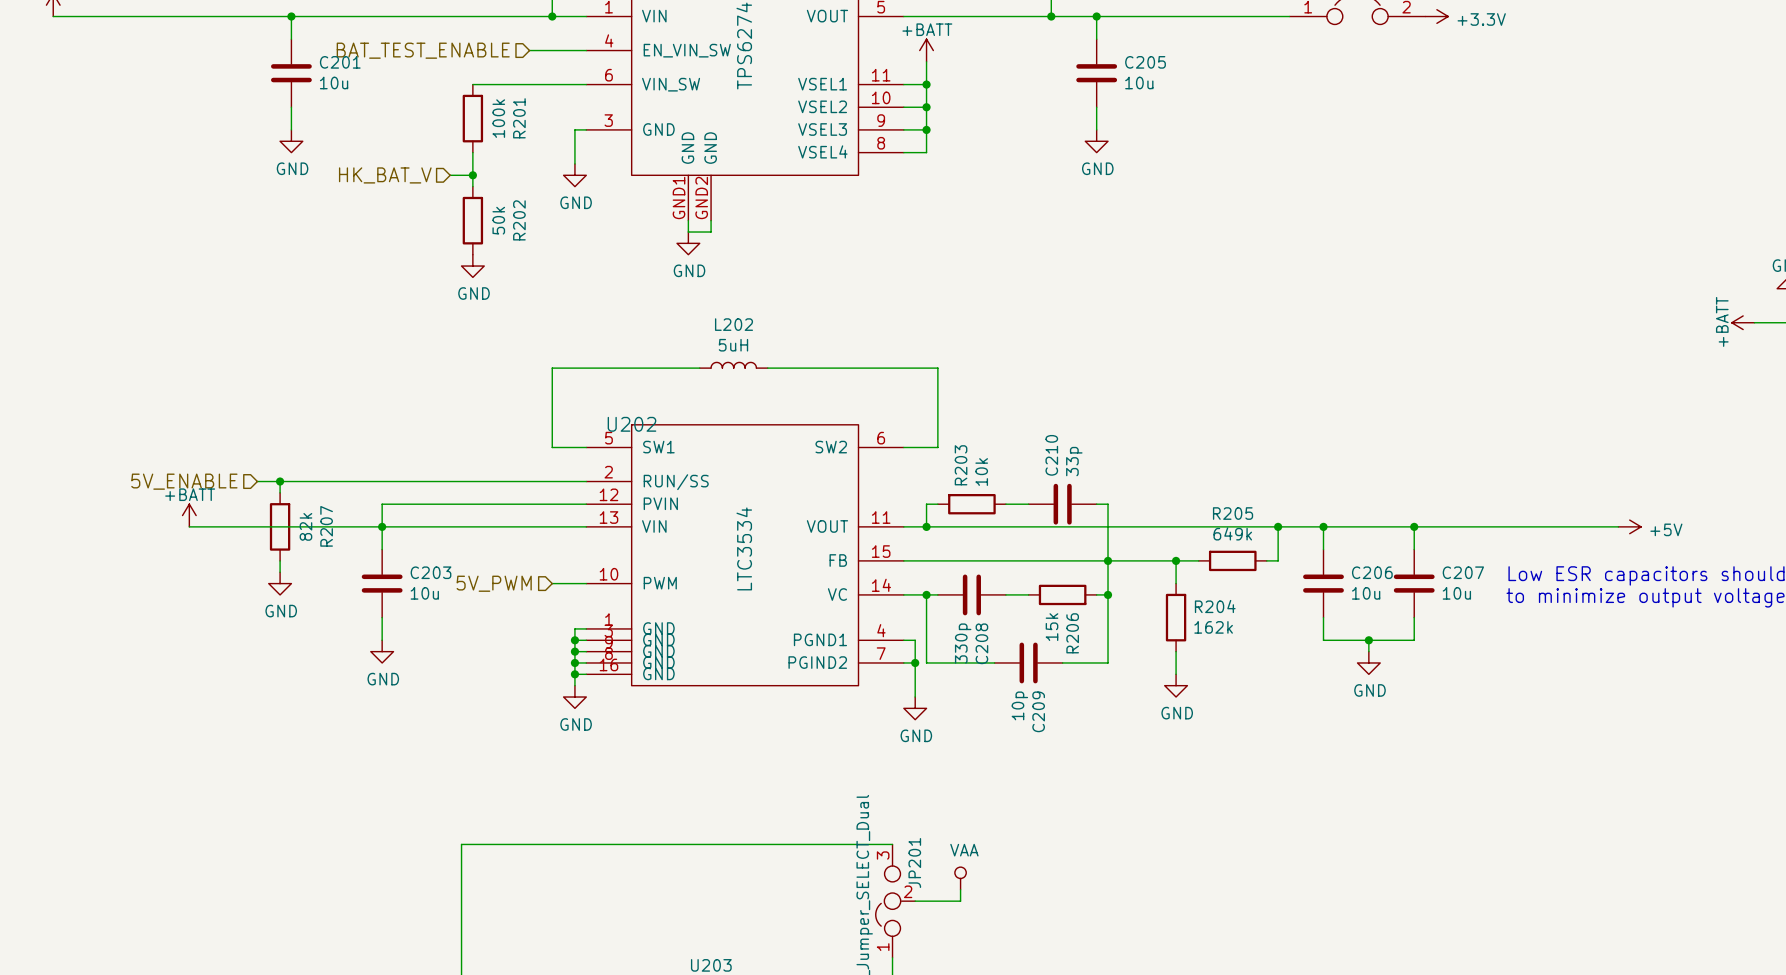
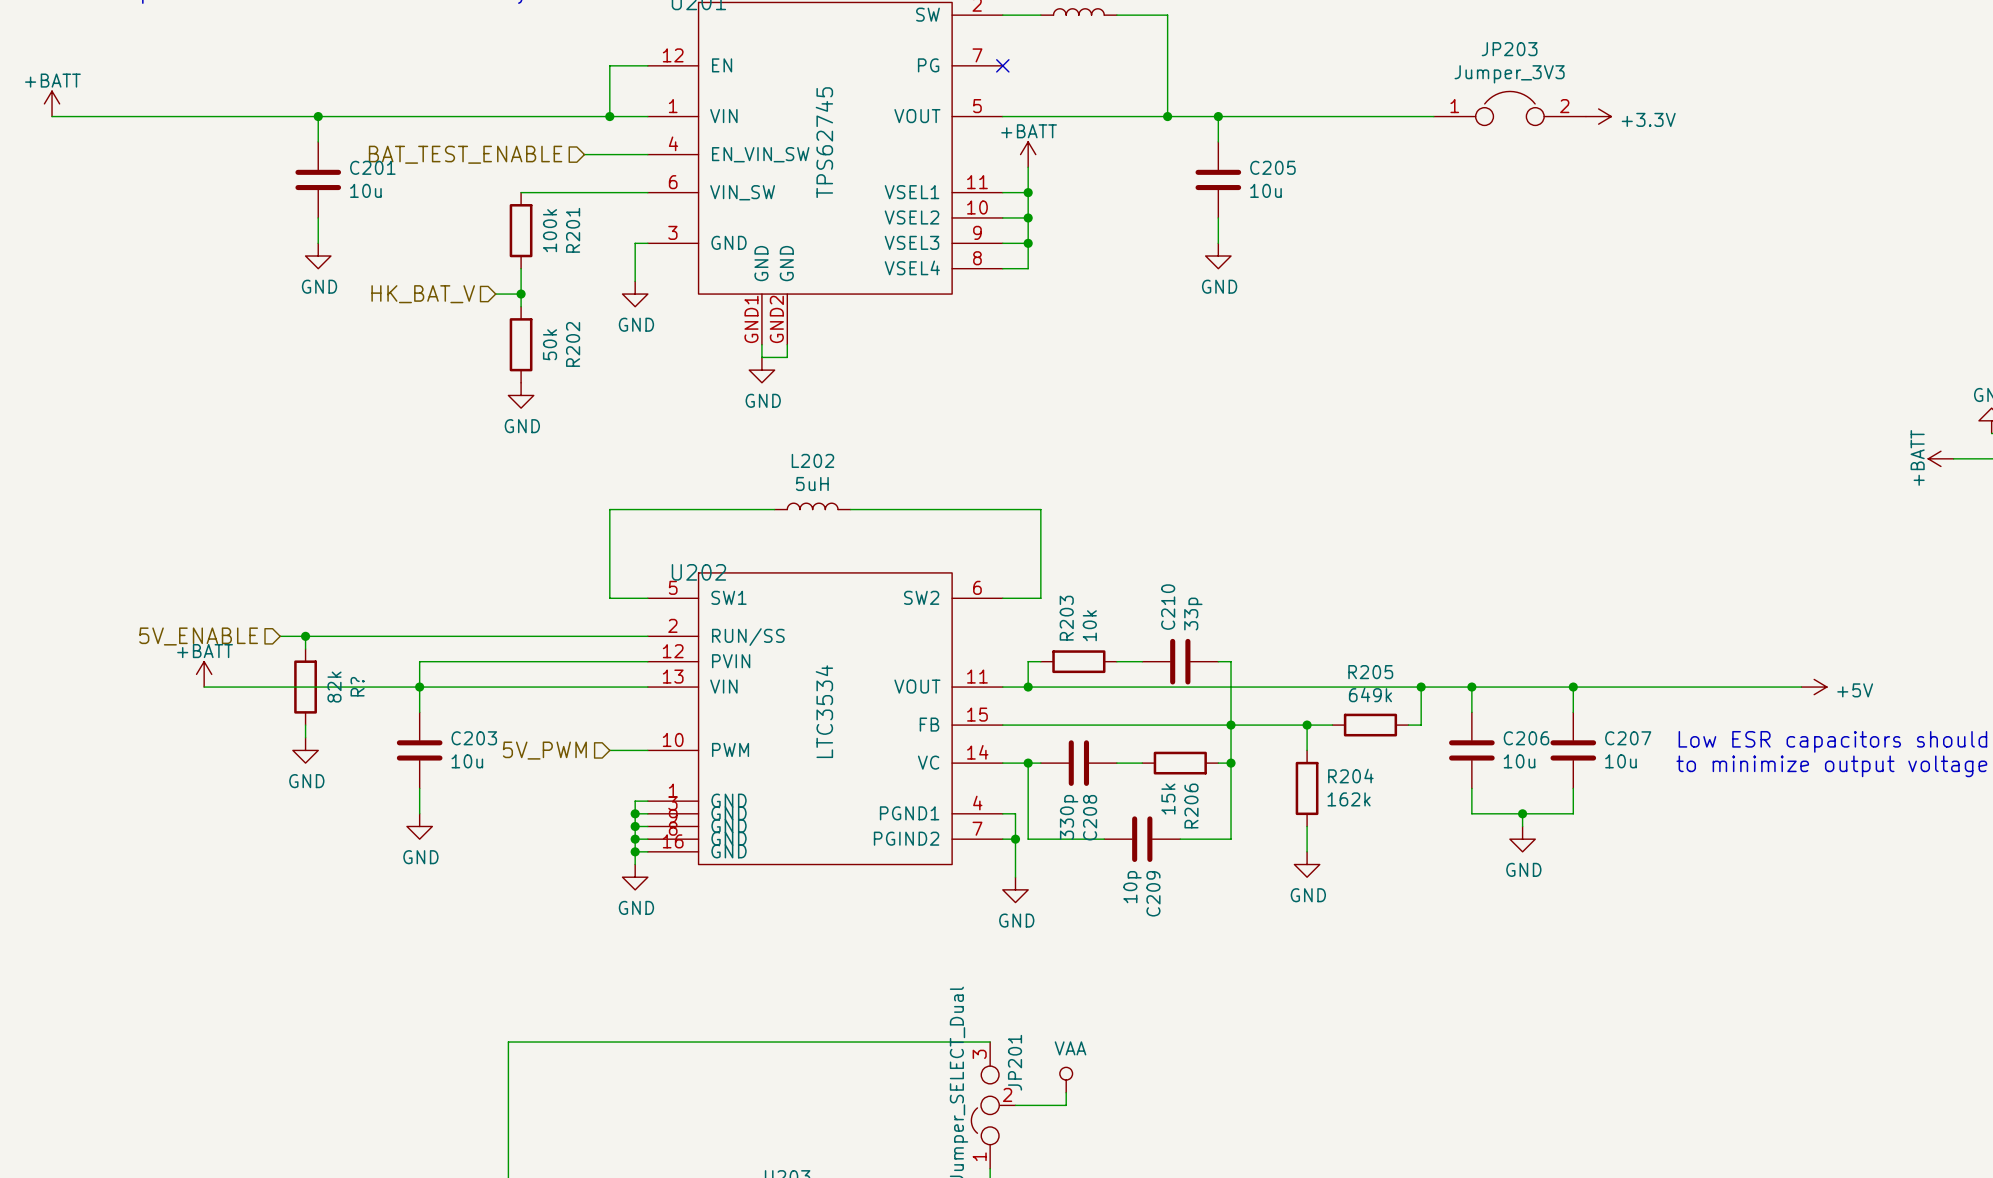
R207 name: R207 (326, 526) -> R? (357, 686)

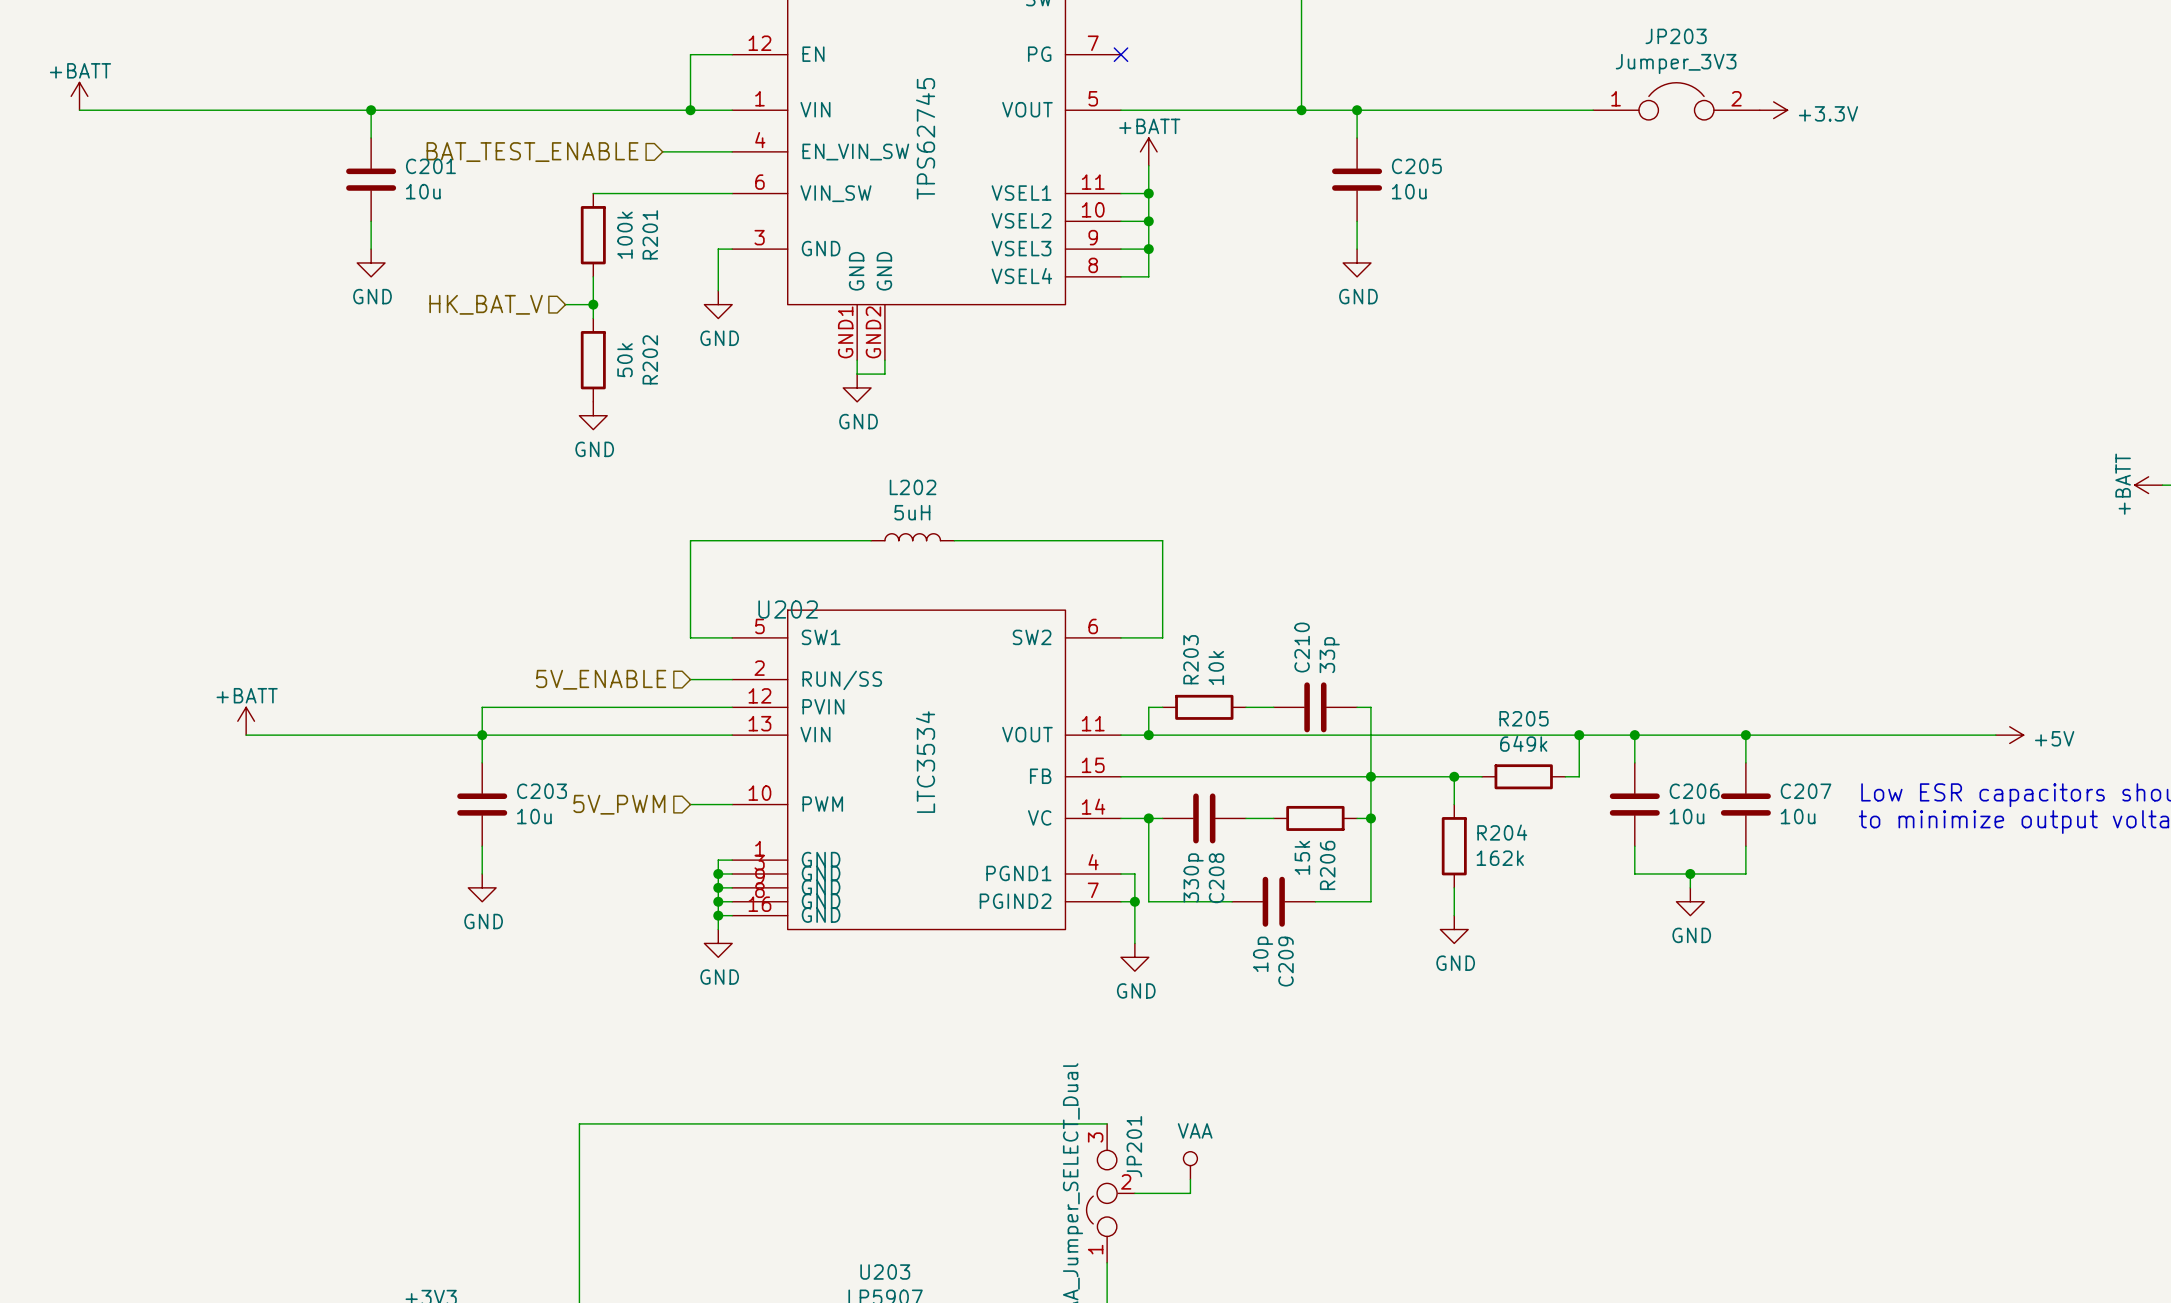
hierarchical label: 5V_ENABLE (198, 636) -> none
wire: (280, 636) (609, 636) -> none
wire: (305, 636) (305, 649) -> none
junction: (305, 636) -> none
hierarchical label: none -> 5V_ENABLE (601, 679)
R?: 82k (305, 687) -> none
wire: (305, 725) (305, 737) -> none
power symbol: GND (305, 750) -> none

